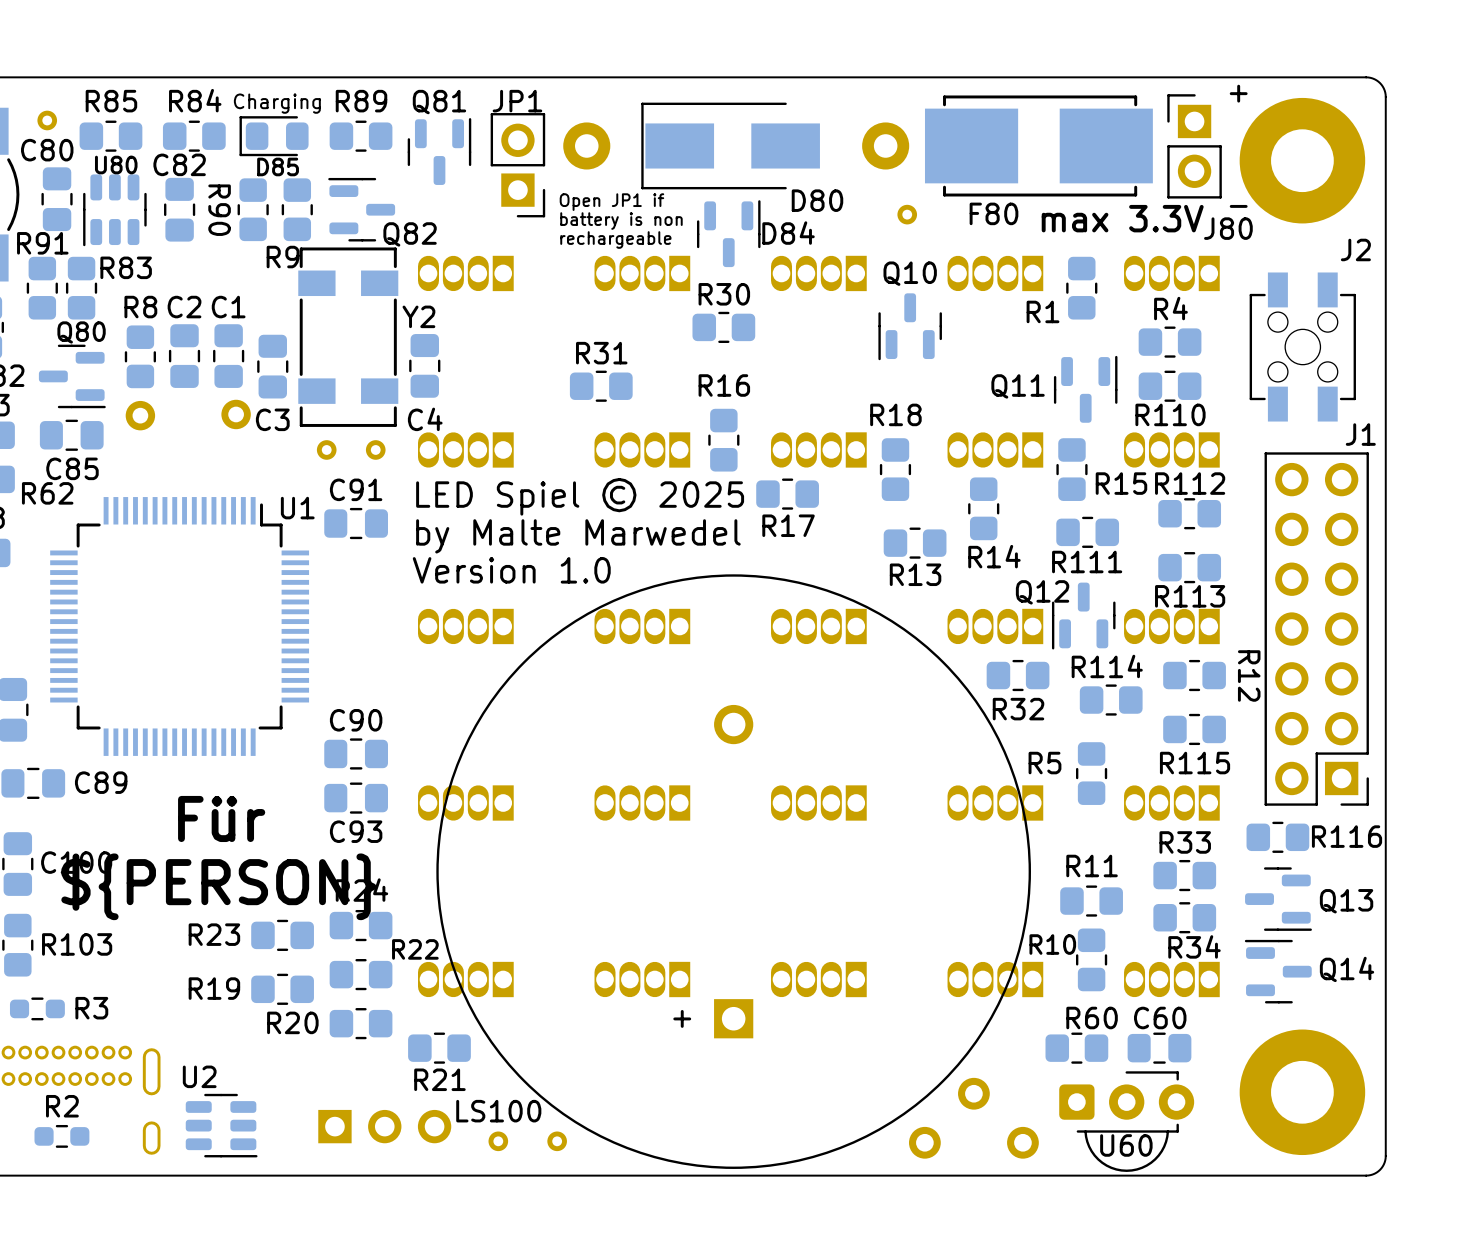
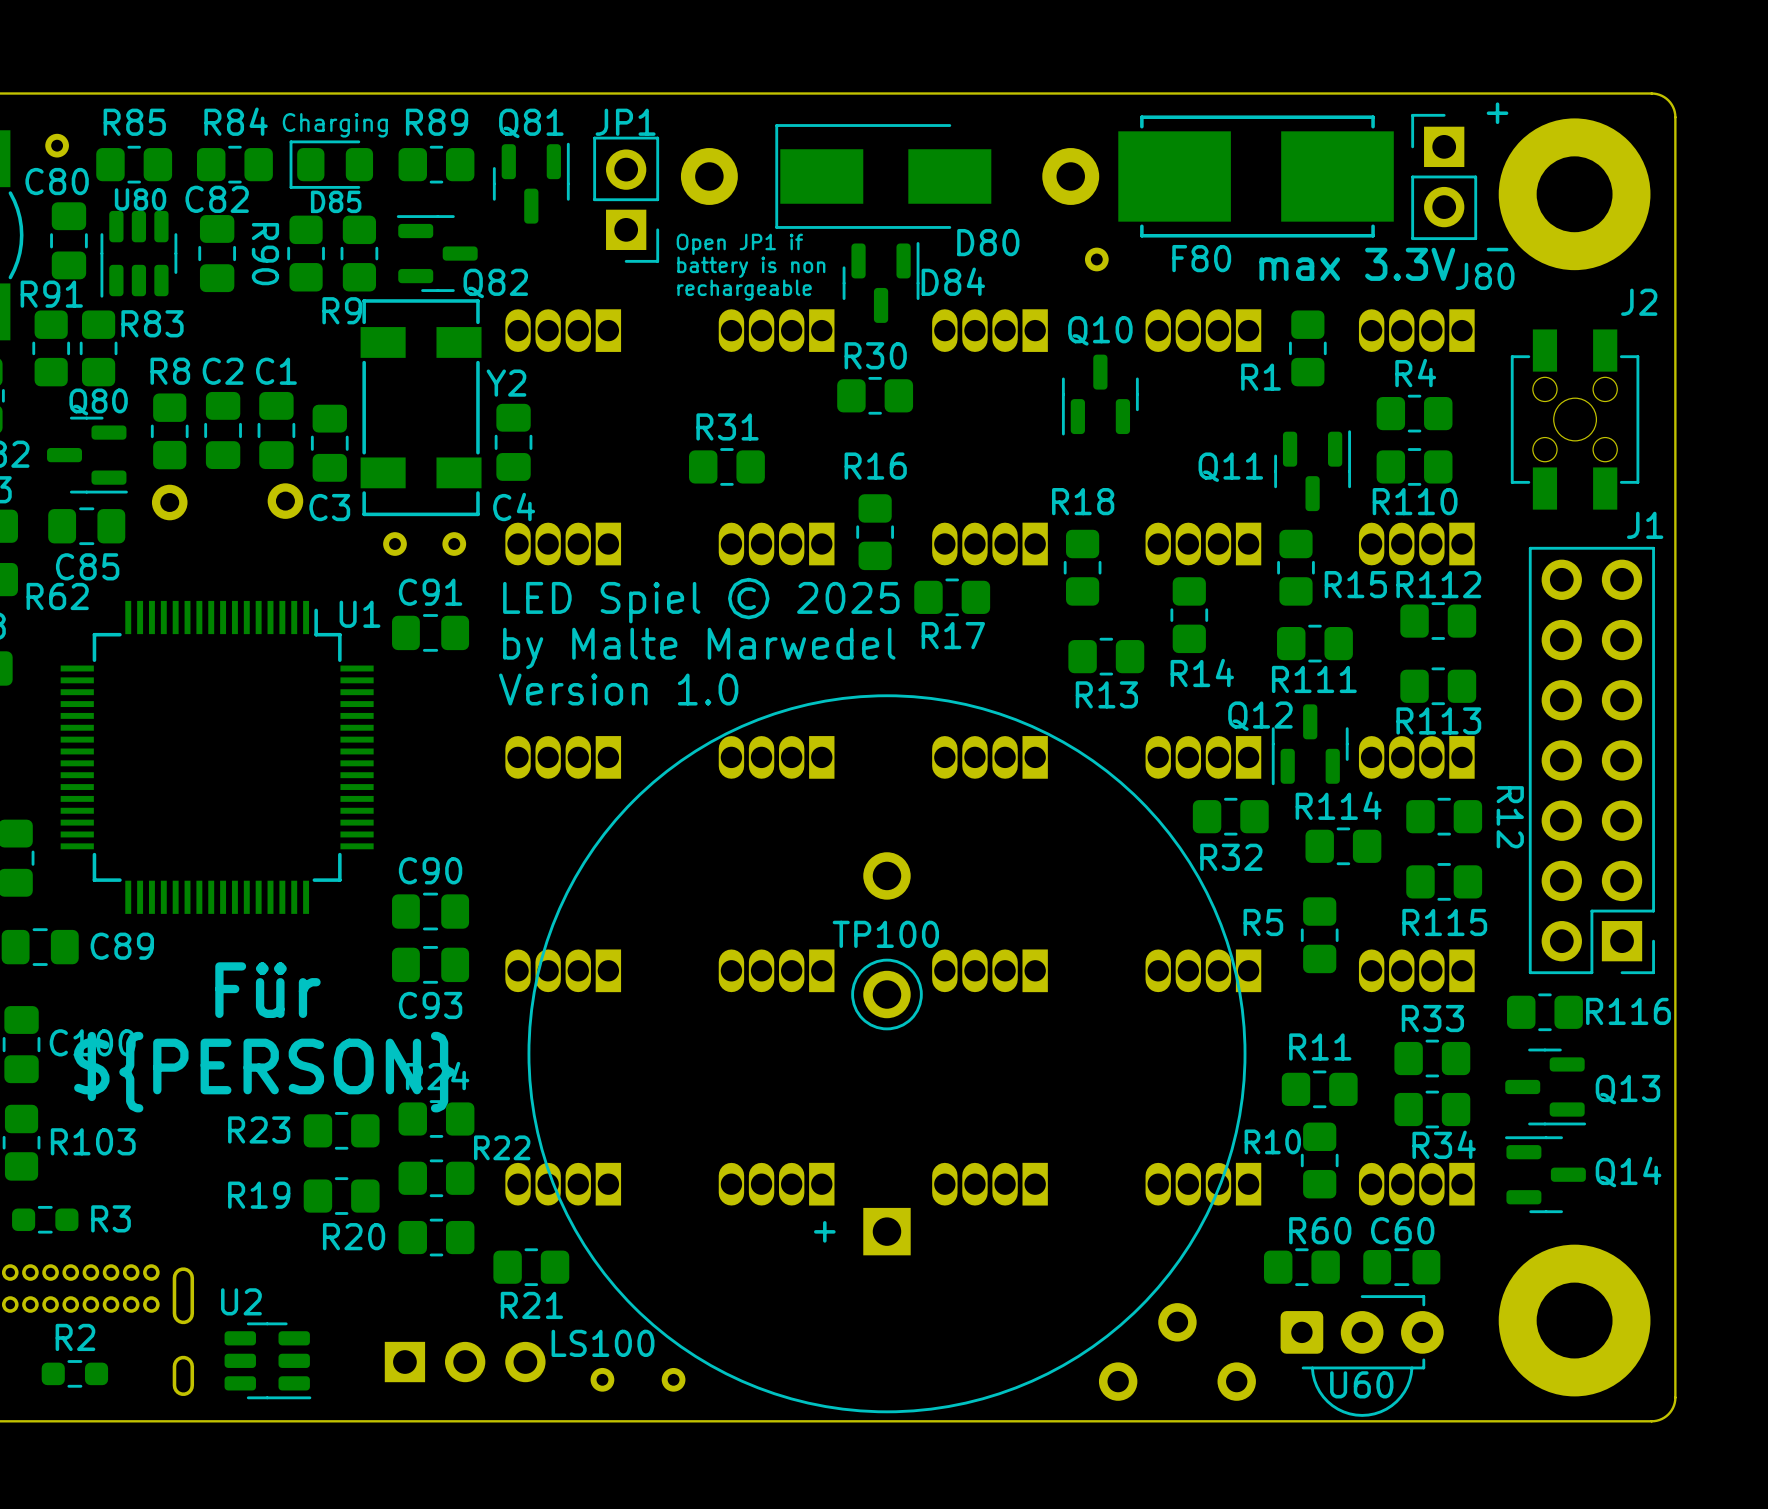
TP100: none -> (886, 994)

